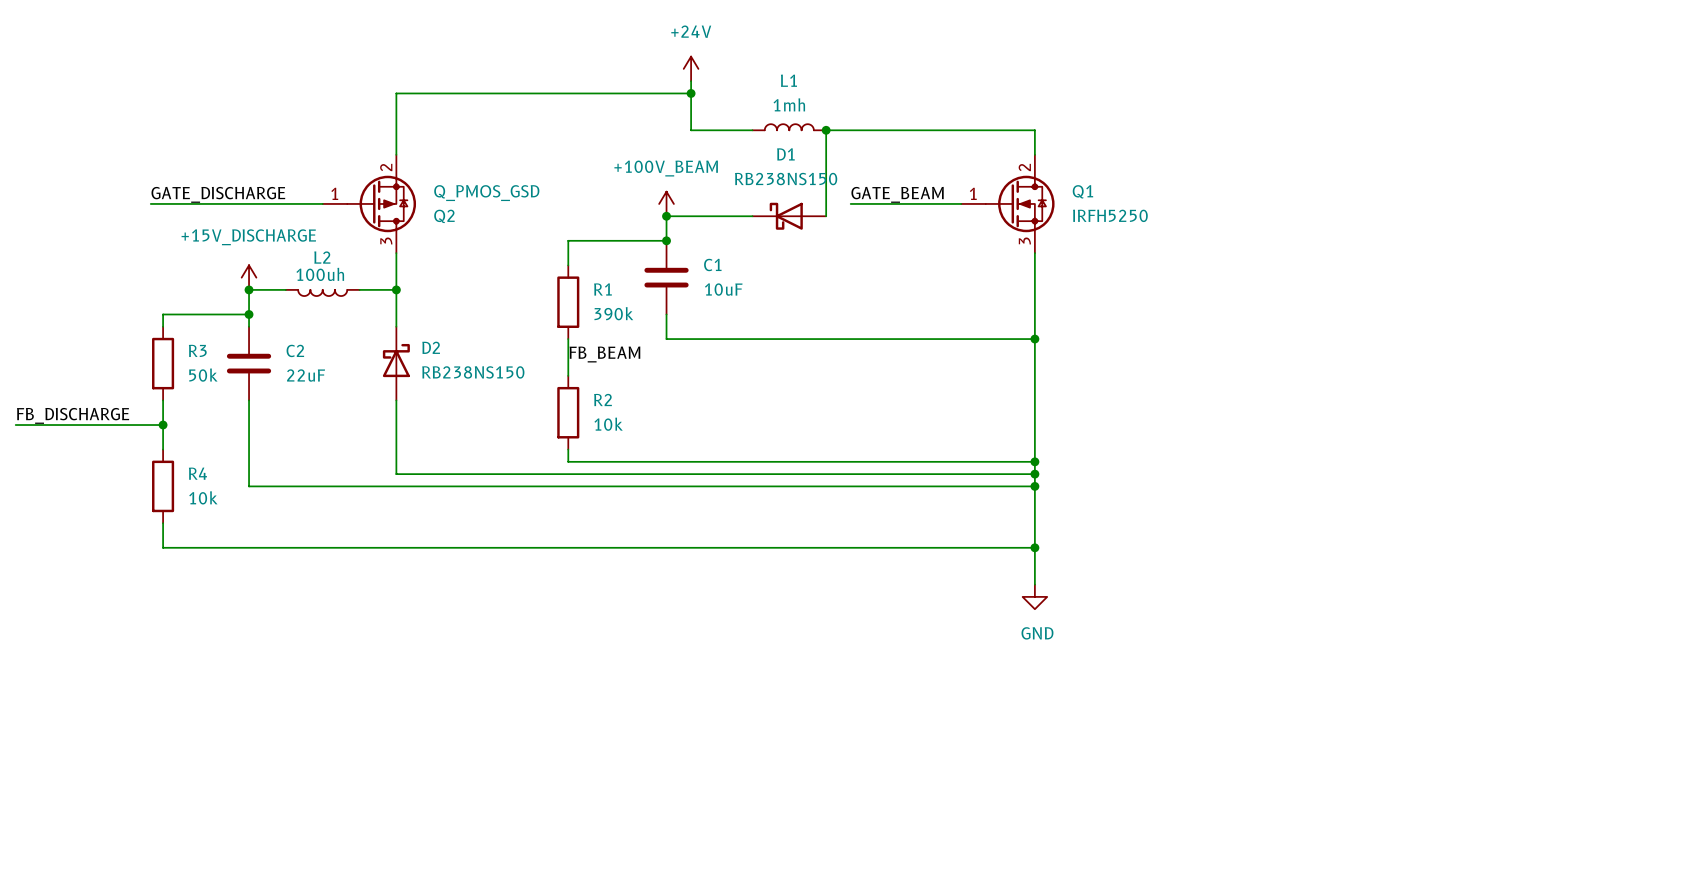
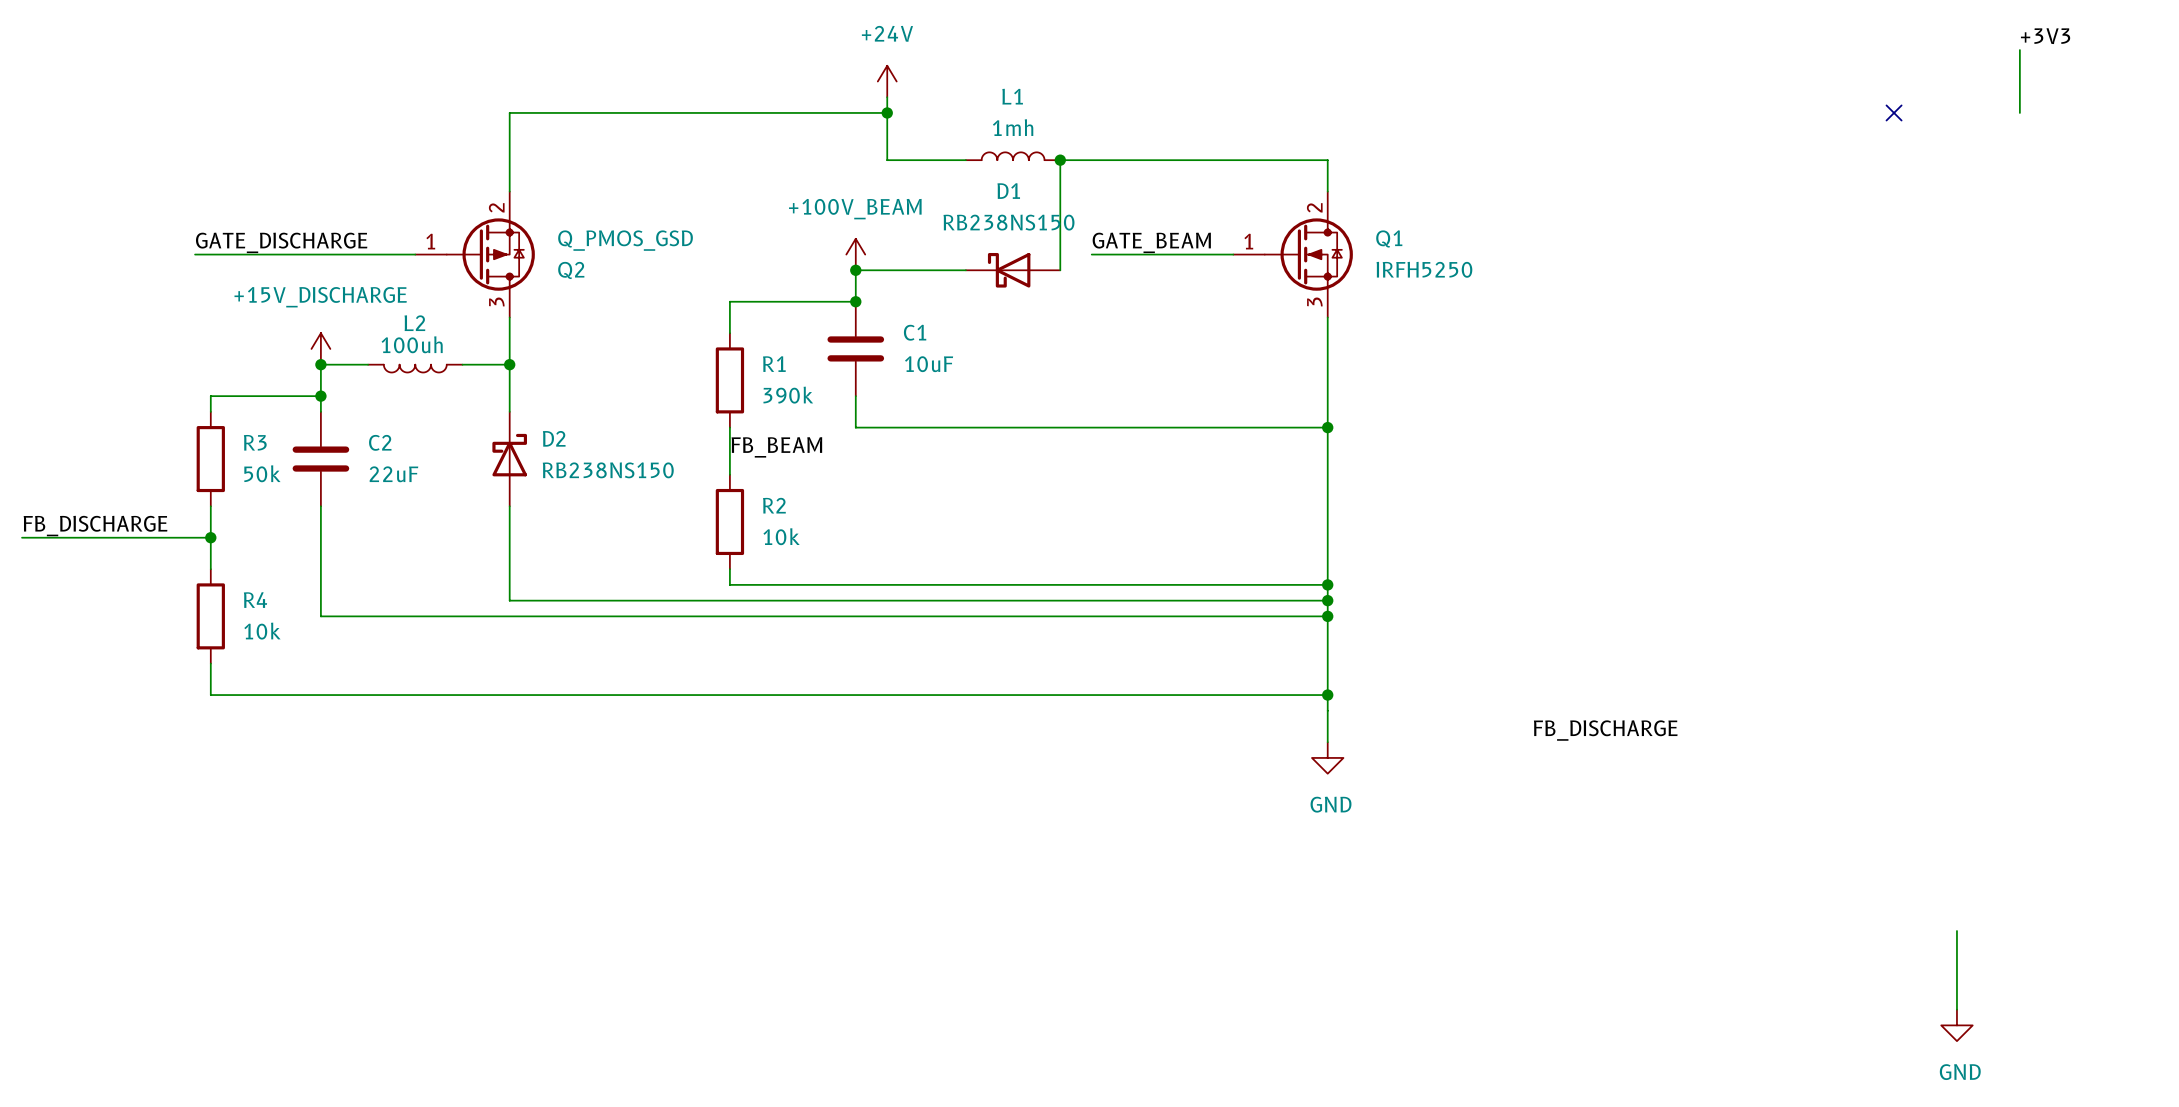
label: none -> +3V3 (2045, 36)
wire: none -> (2019, 50) (2019, 112)
no-connect mark: none -> (1894, 112)
label: none -> FB_DISCHARGE (1605, 730)
wire: none -> (1956, 931) (1956, 1009)
power symbol: none -> GND (1956, 1025)

